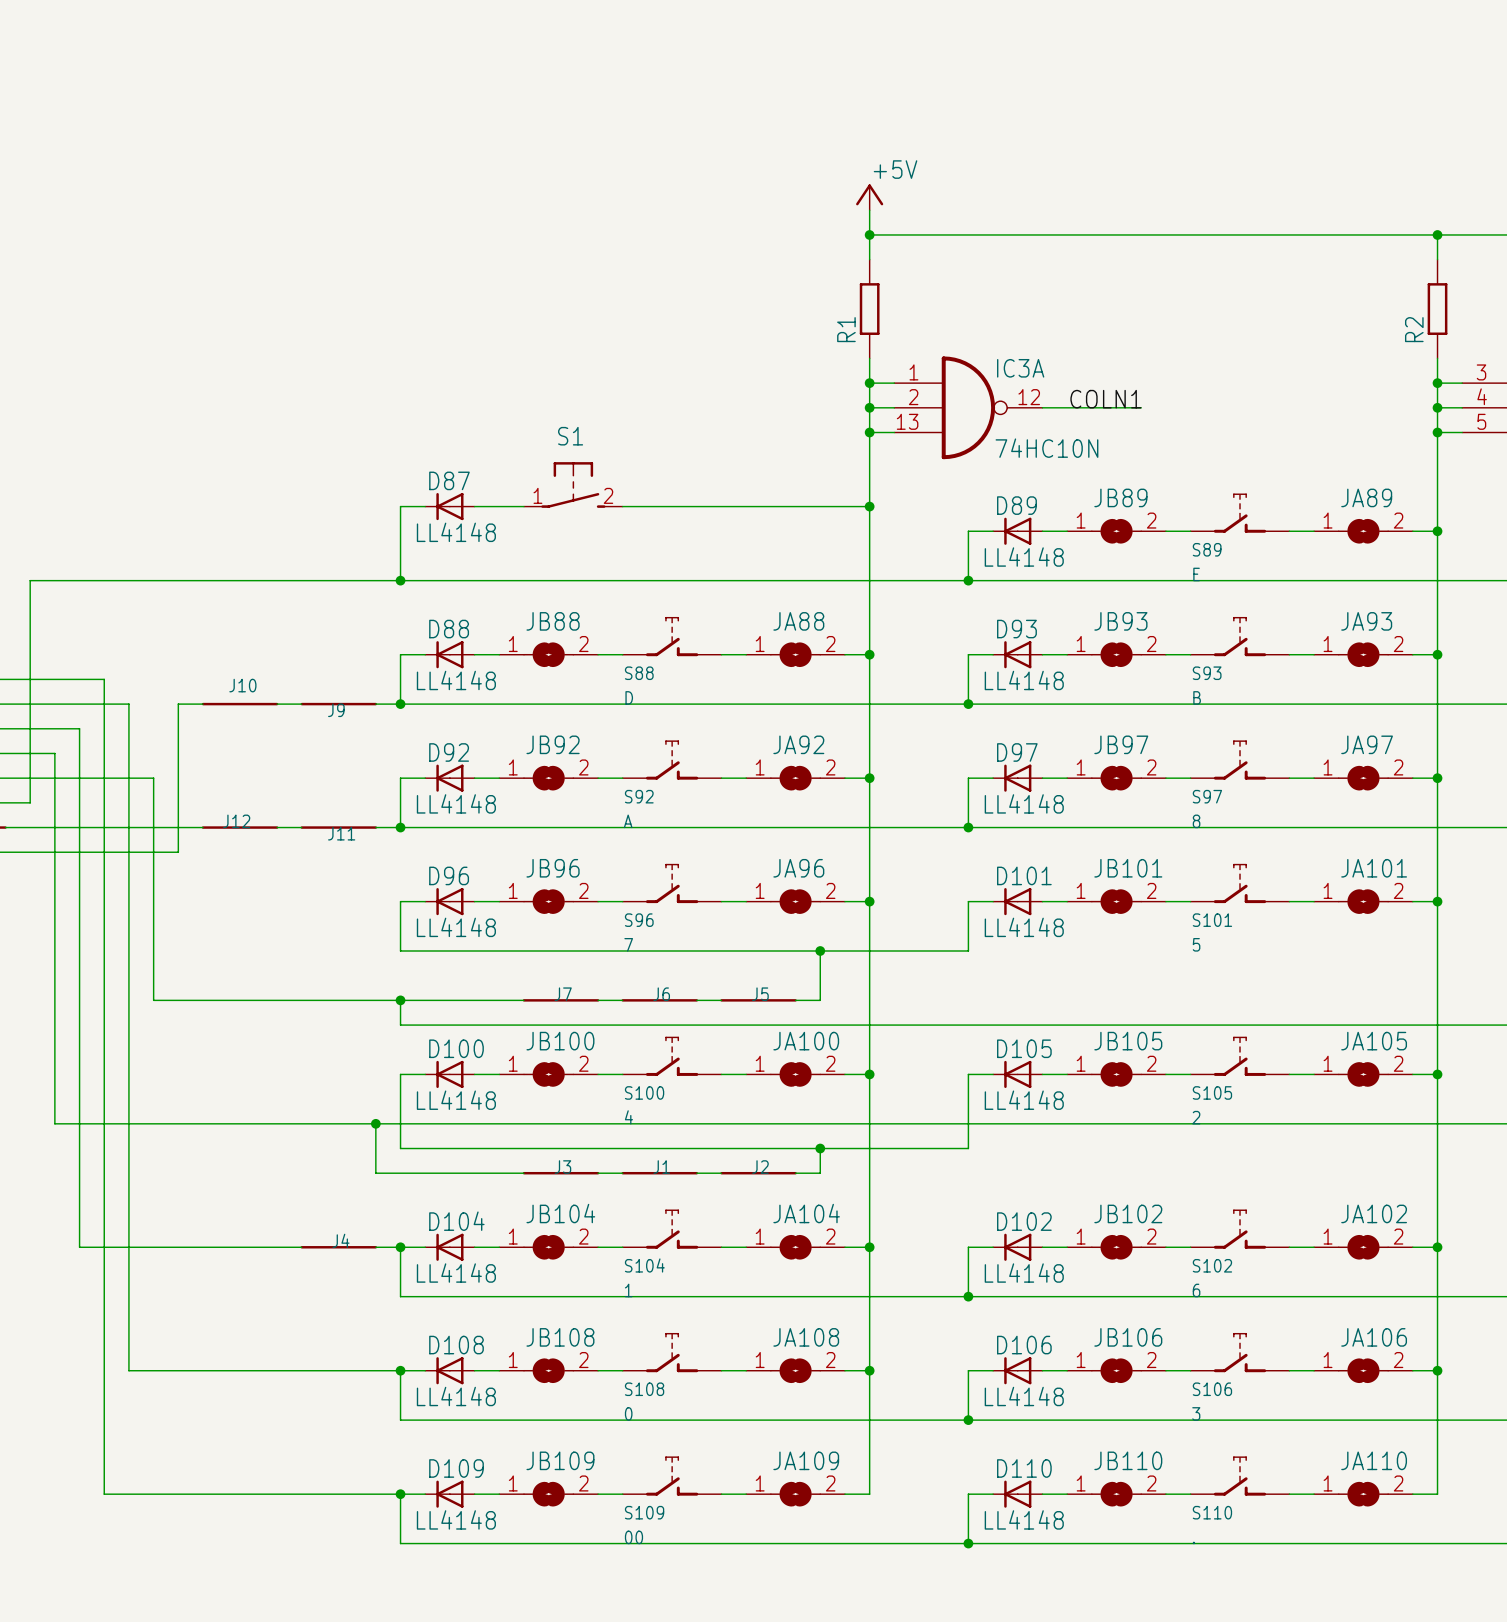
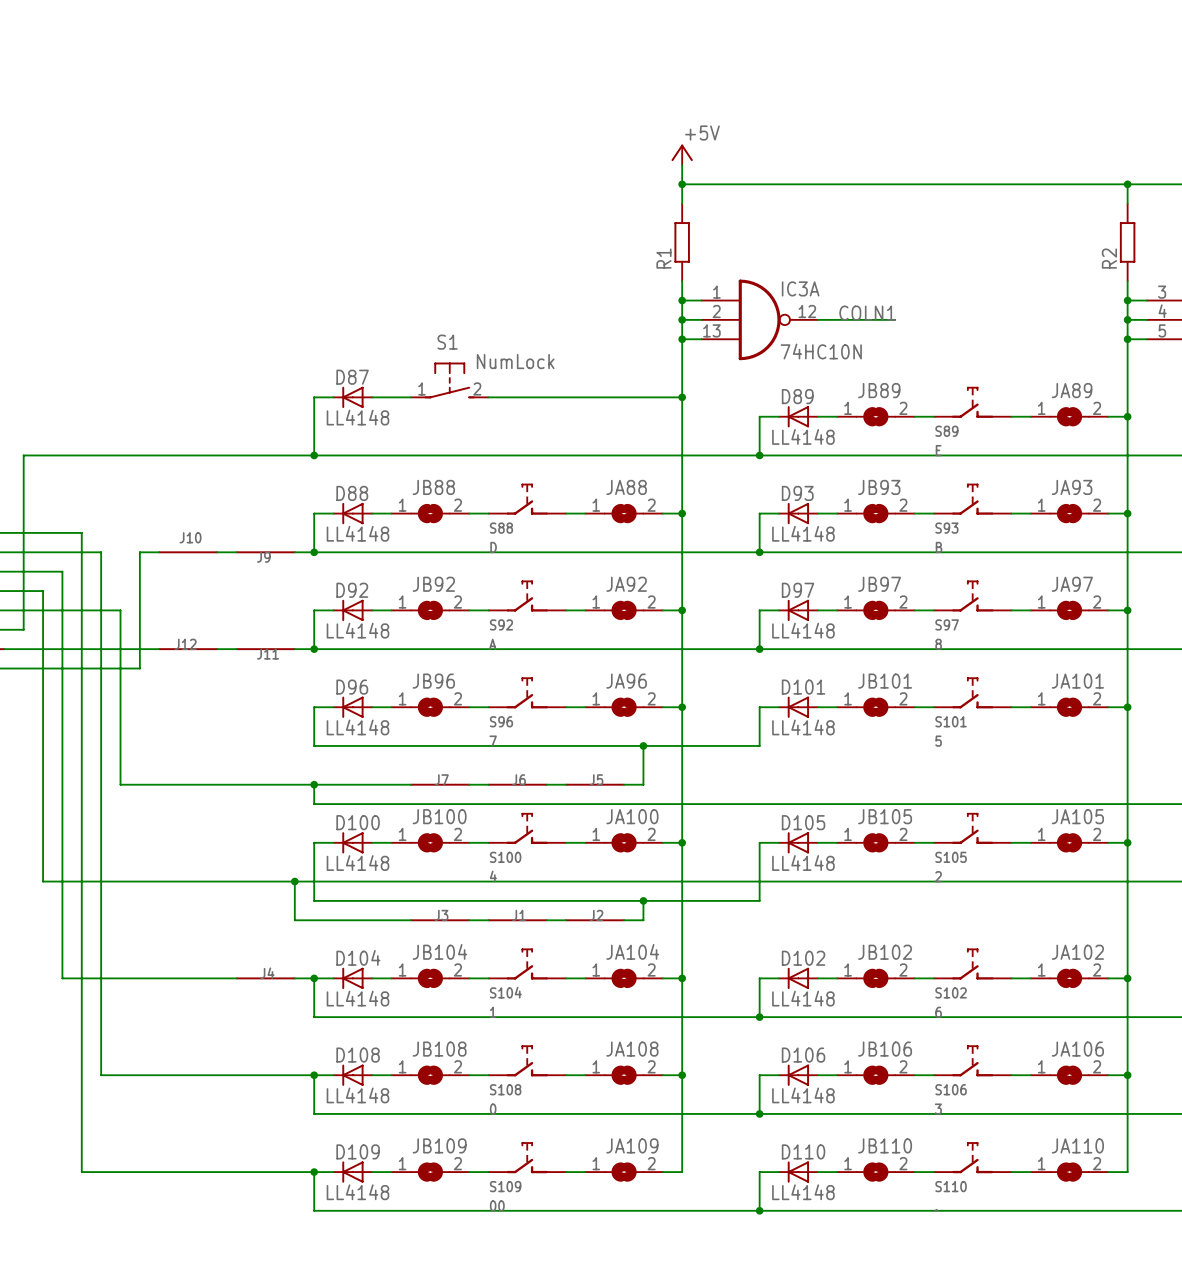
S1 value: none -> NumLock (515, 361)

